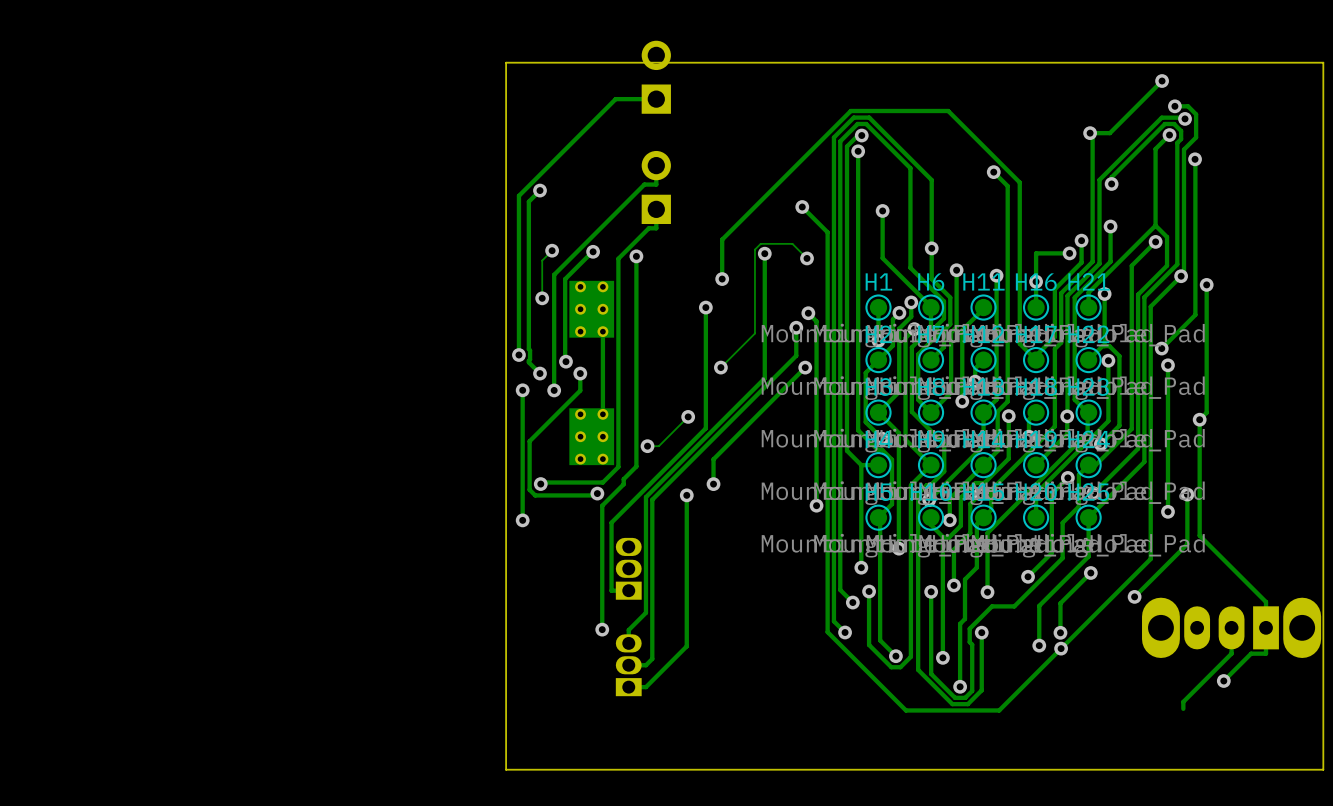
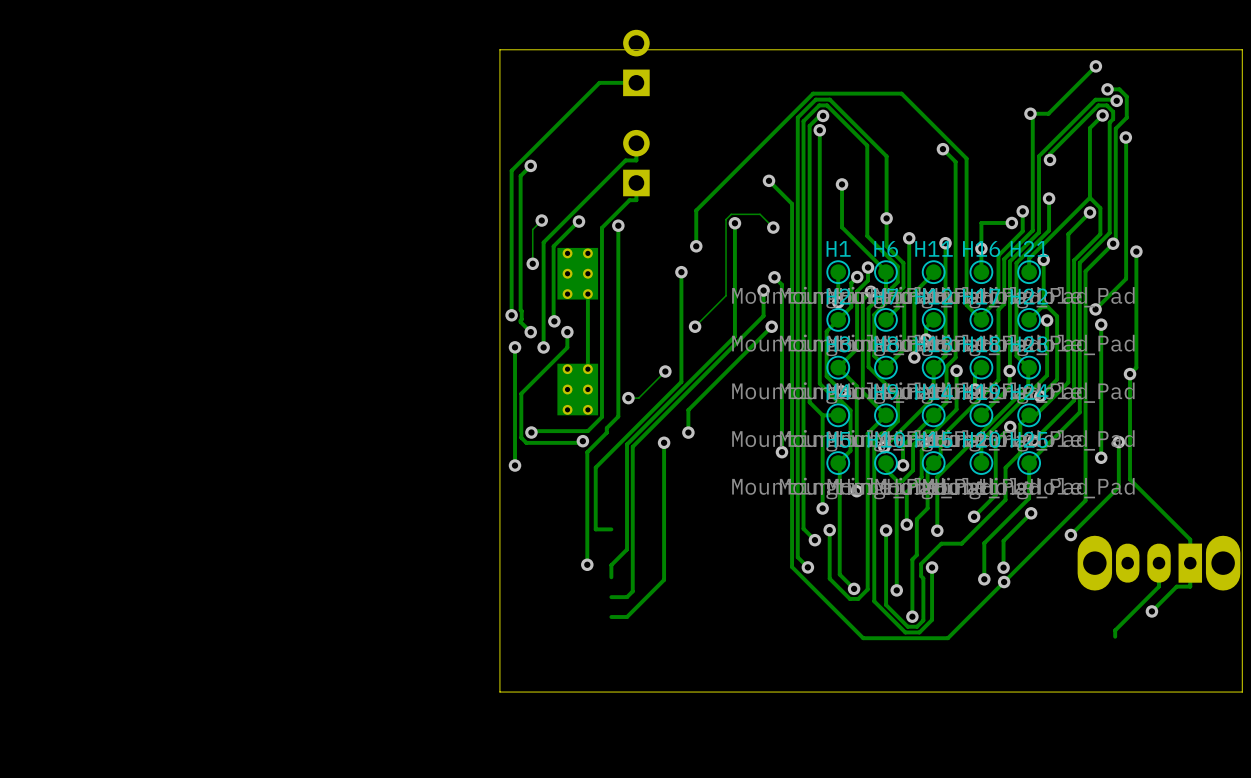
part: (628, 568) -> none
part: (628, 665) -> none

